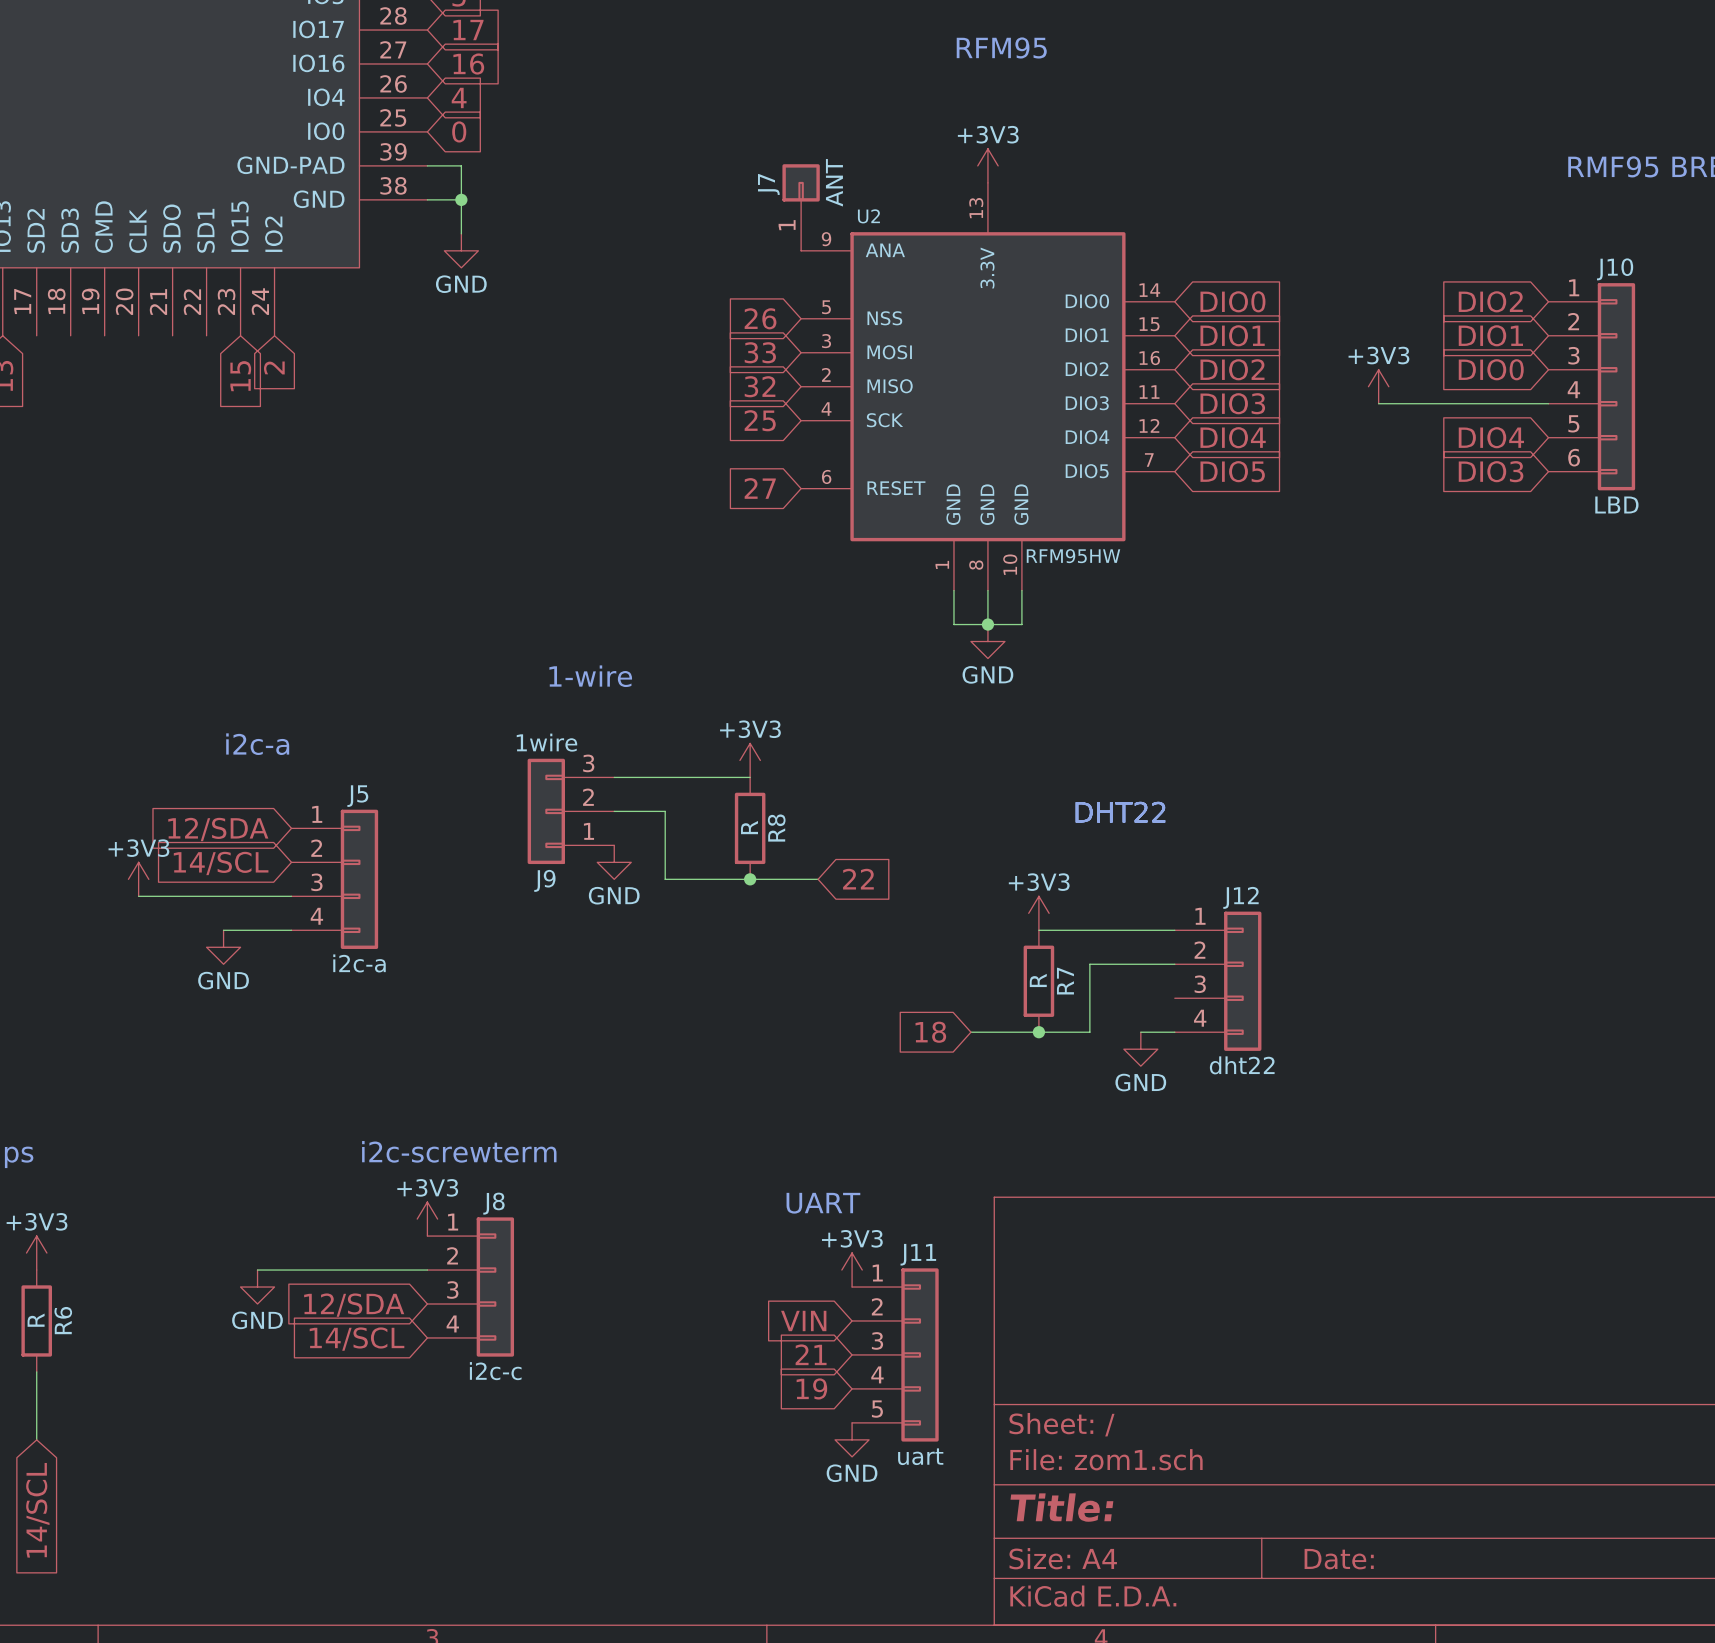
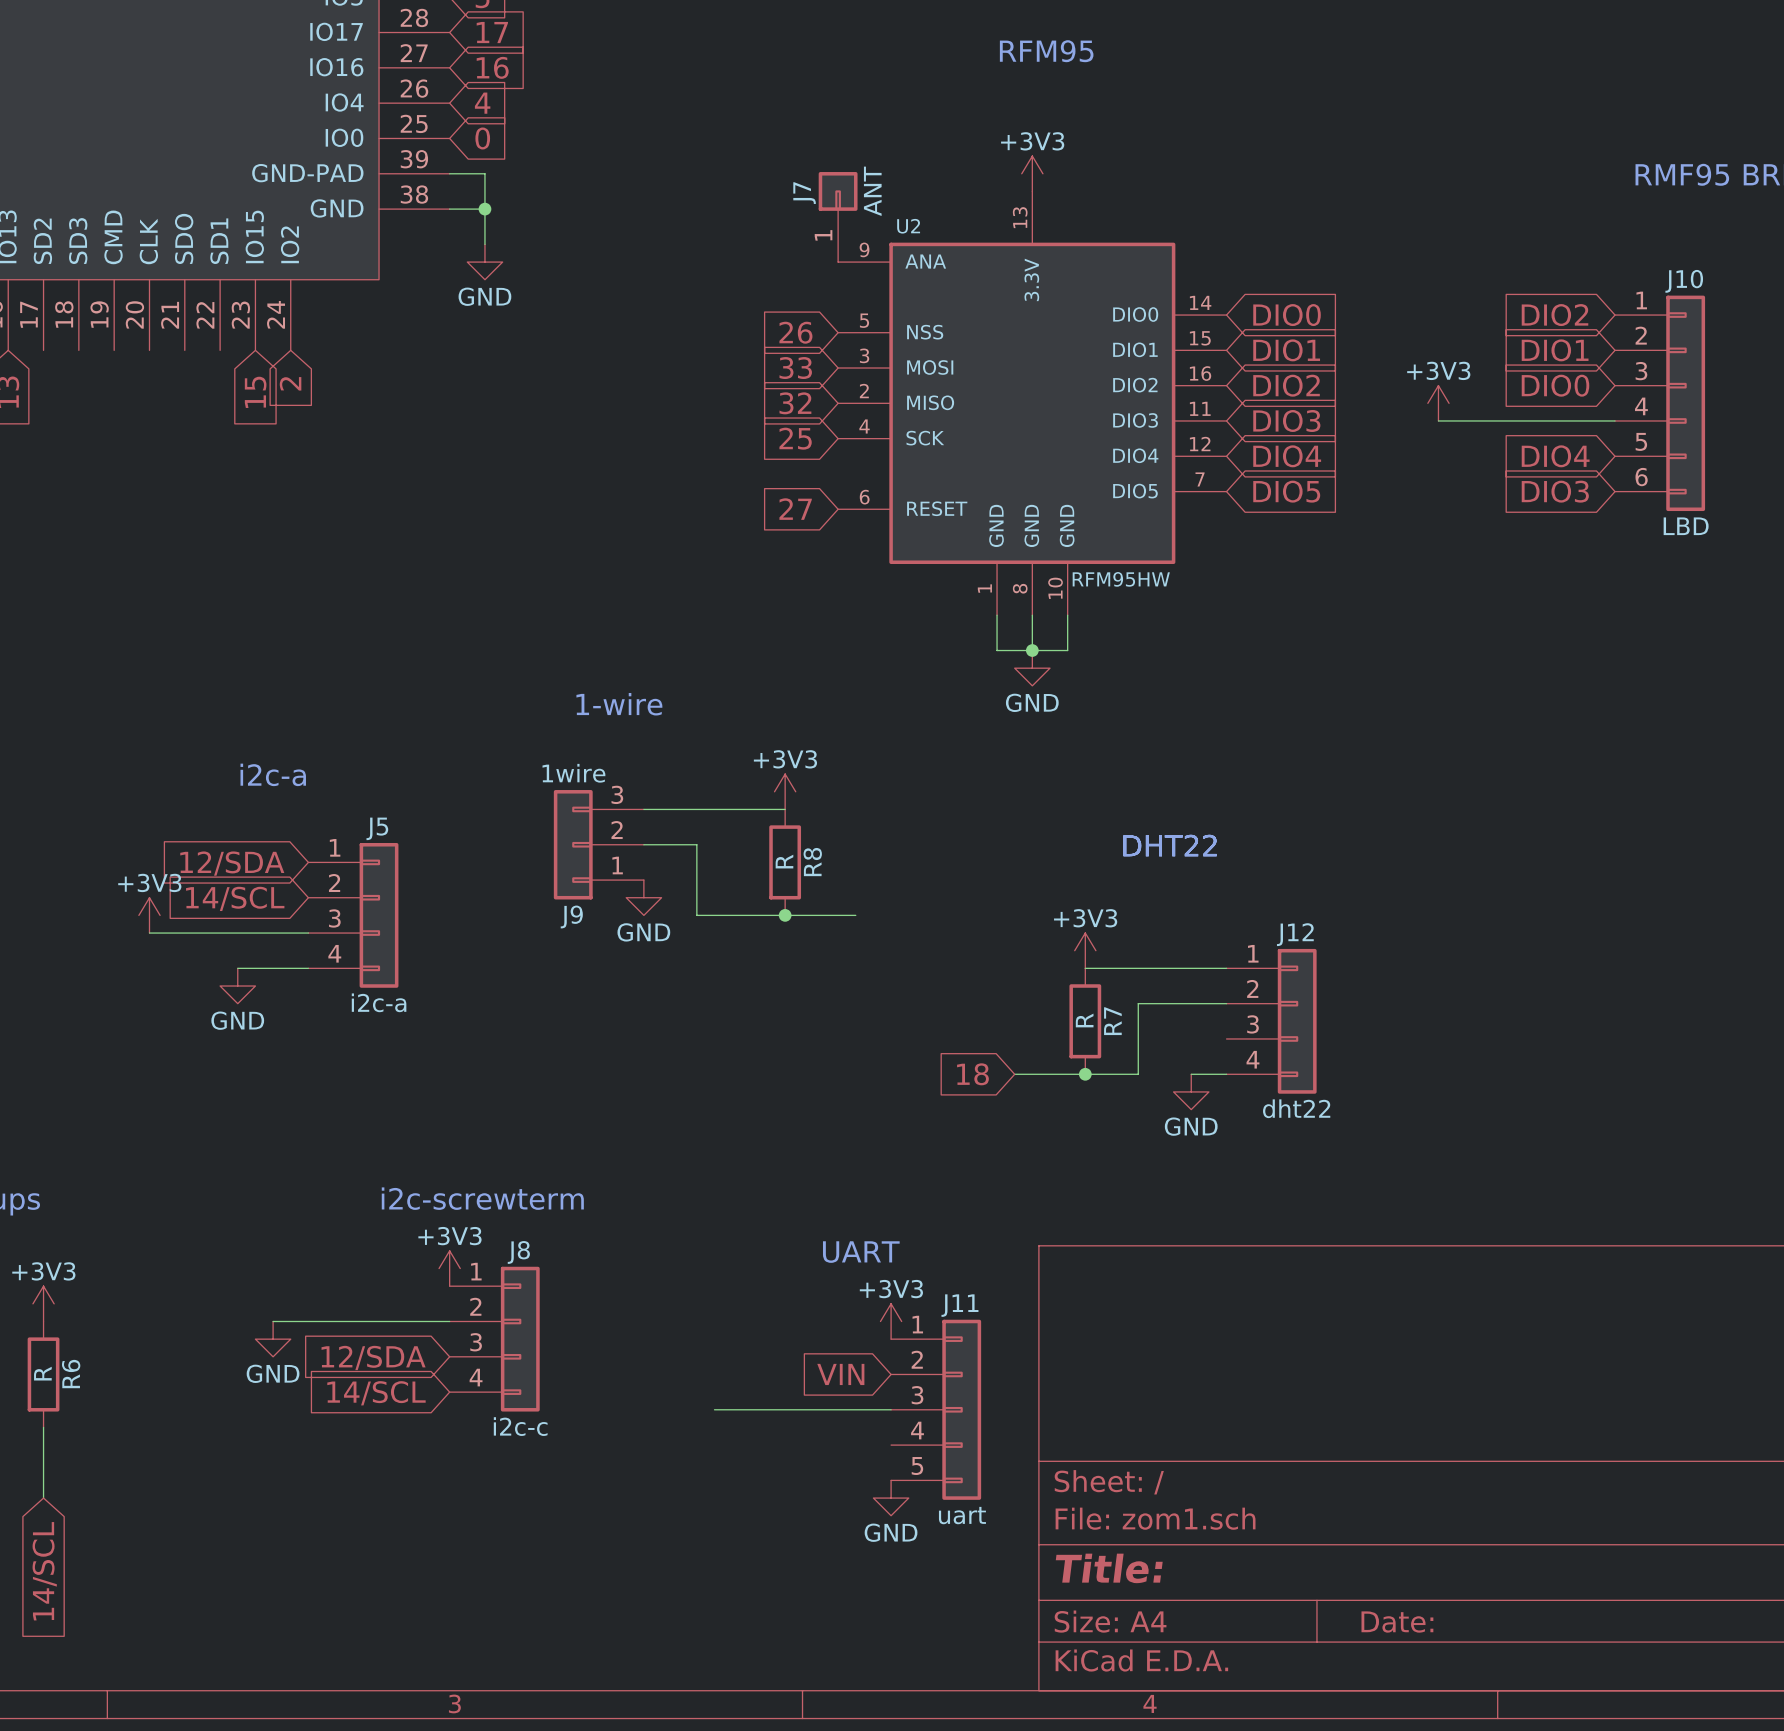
global label: 22 (858, 879) -> none
wire: none -> (714, 1409) (891, 1409)
global label: 21 (811, 1354) -> none
global label: 19 (811, 1388) -> none

